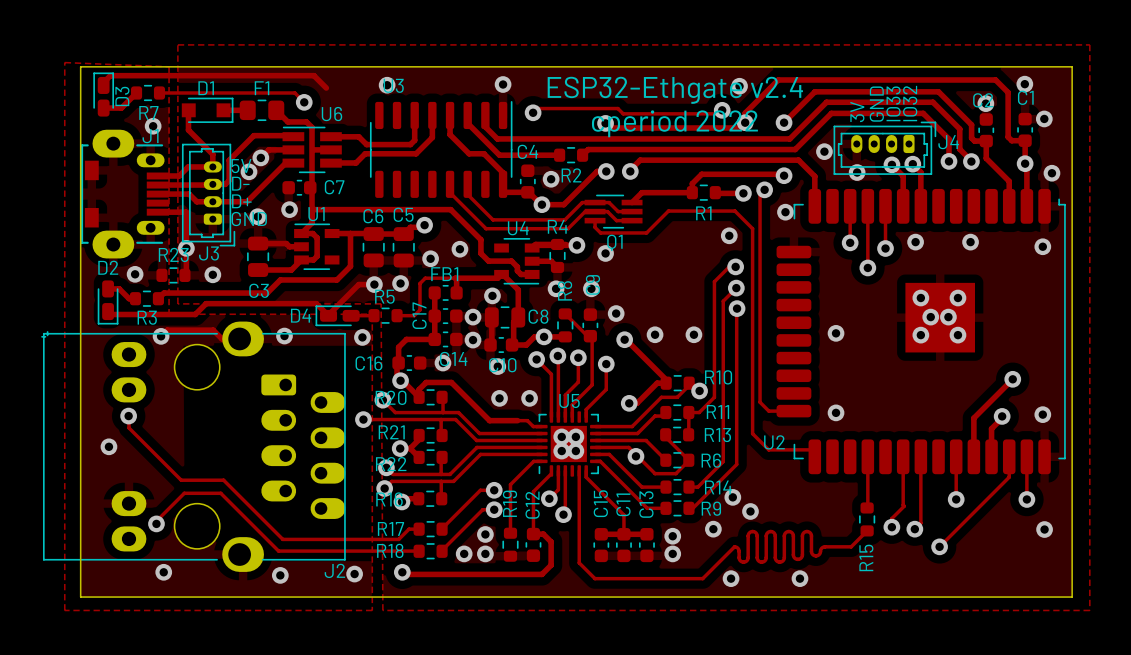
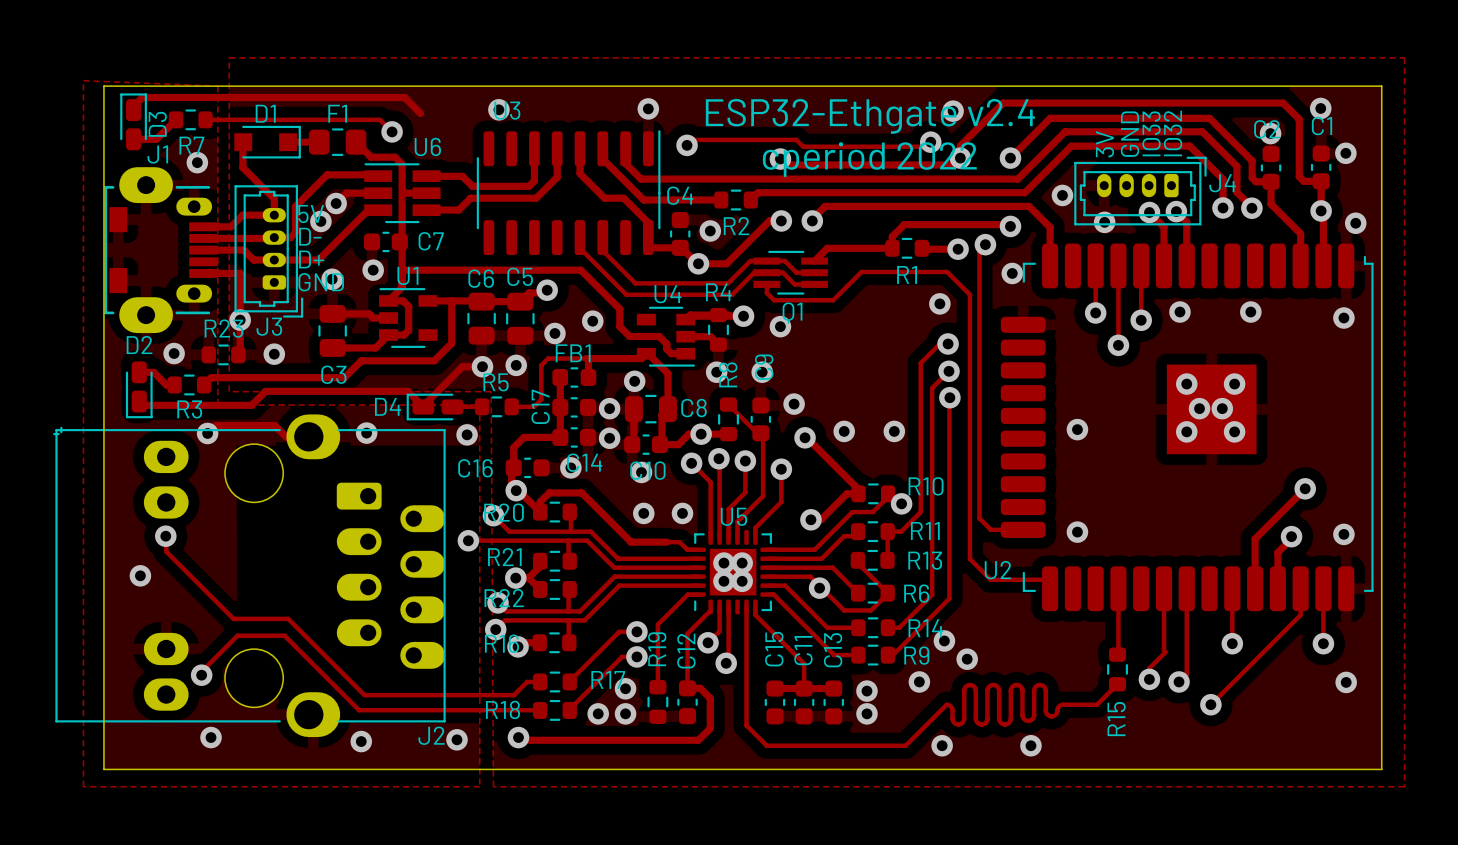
J1 name position: J1 (150, 136) -> J1 (157, 154)
R17 name position: R17 (390, 528) -> R17 (608, 679)

